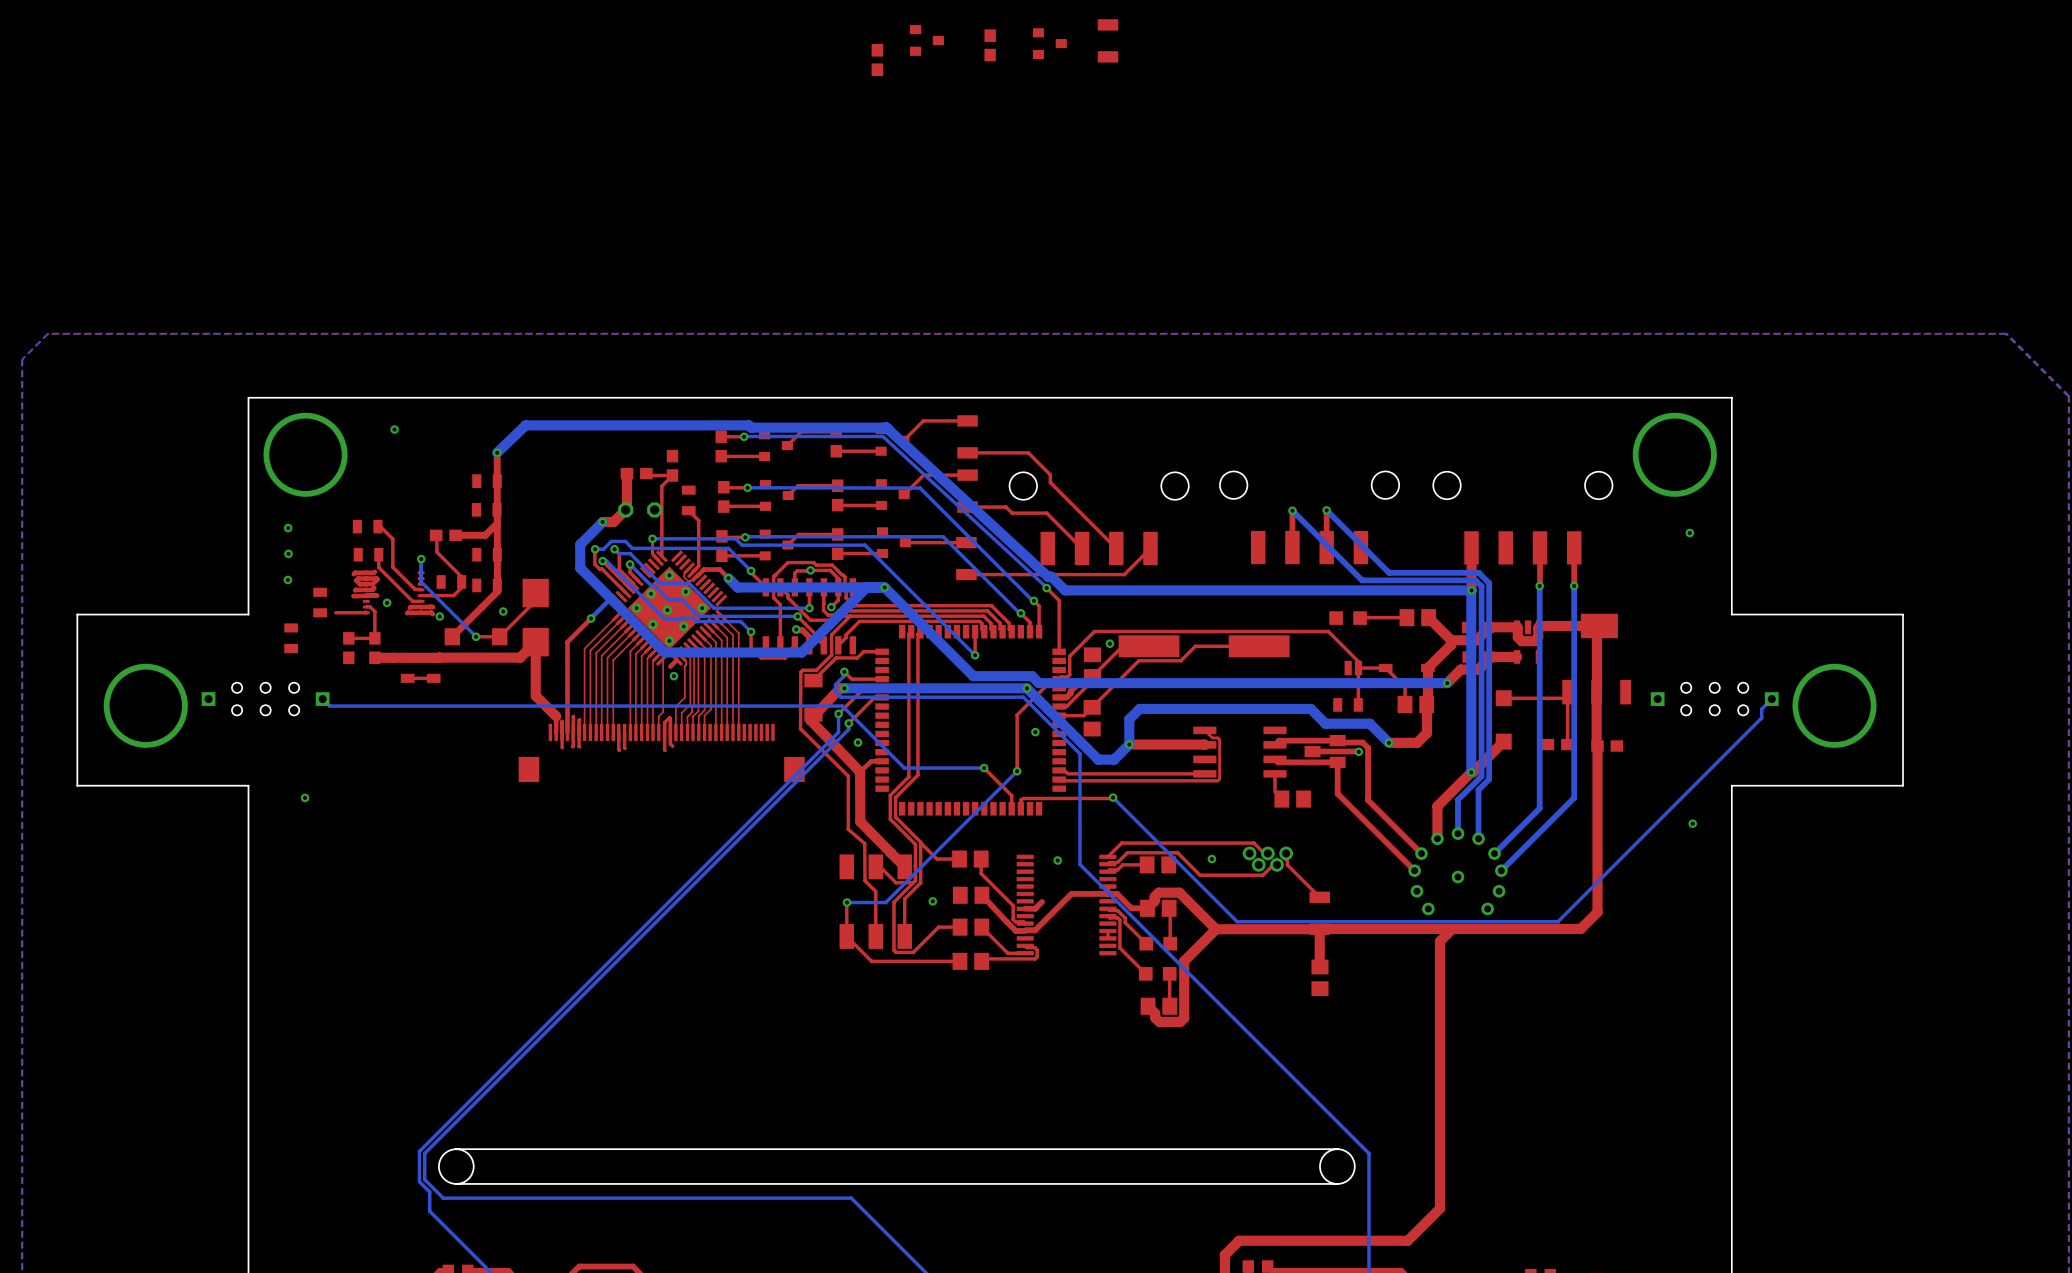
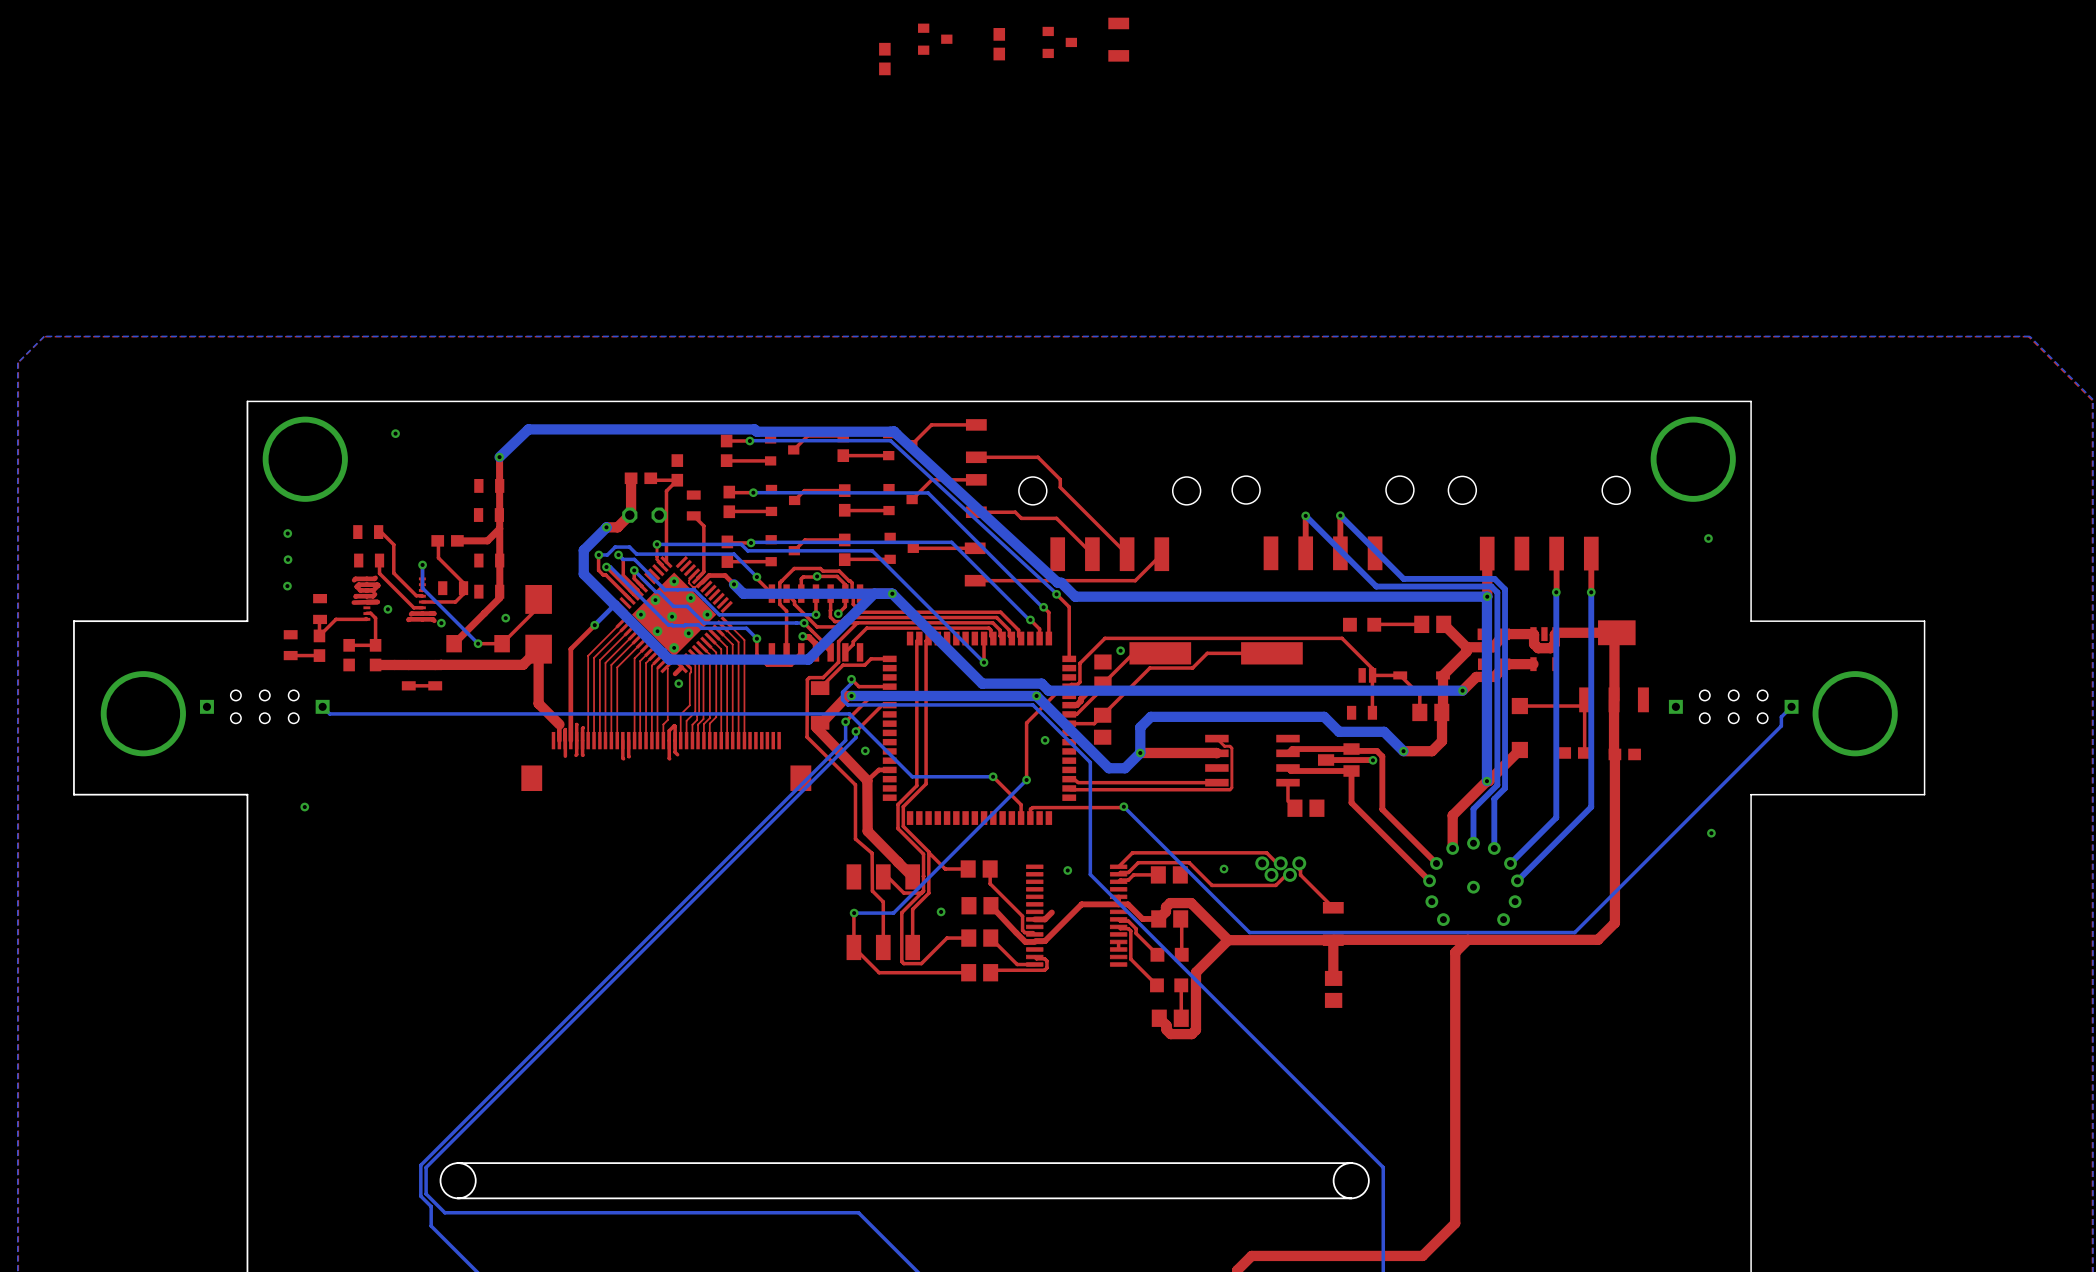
top track: none -> (336, 619) (319, 635) (319, 620)
part: none -> (319, 645)
top track: none -> (319, 655) (290, 655)

